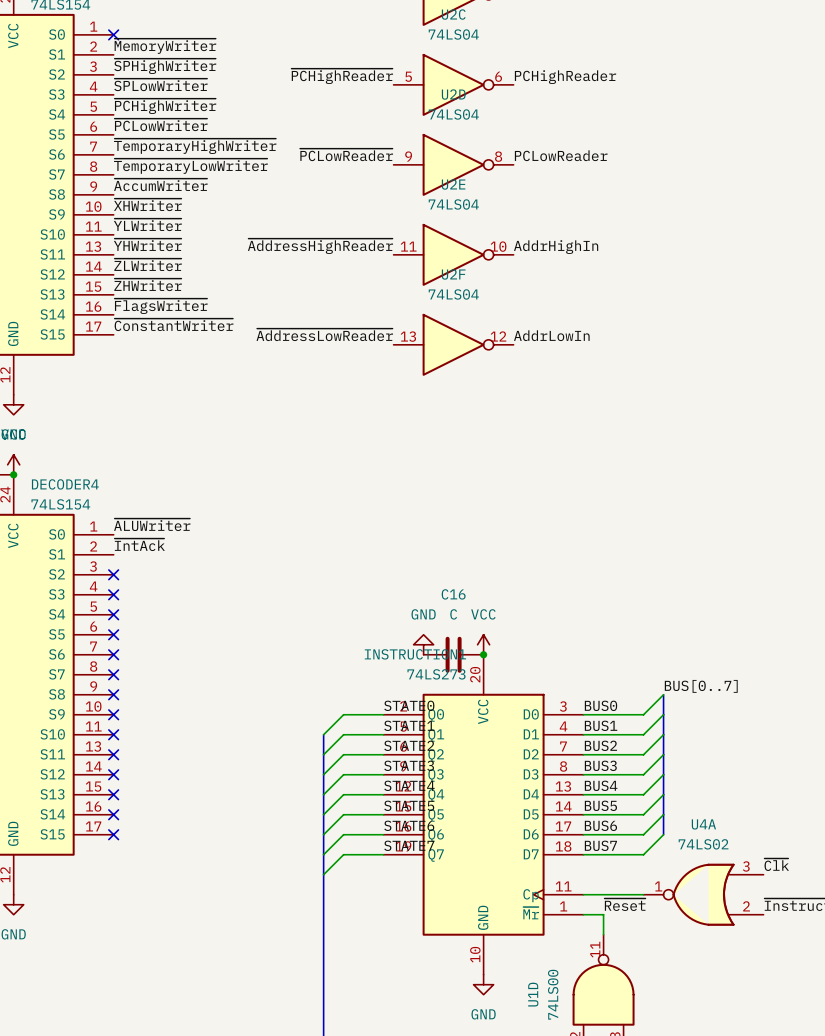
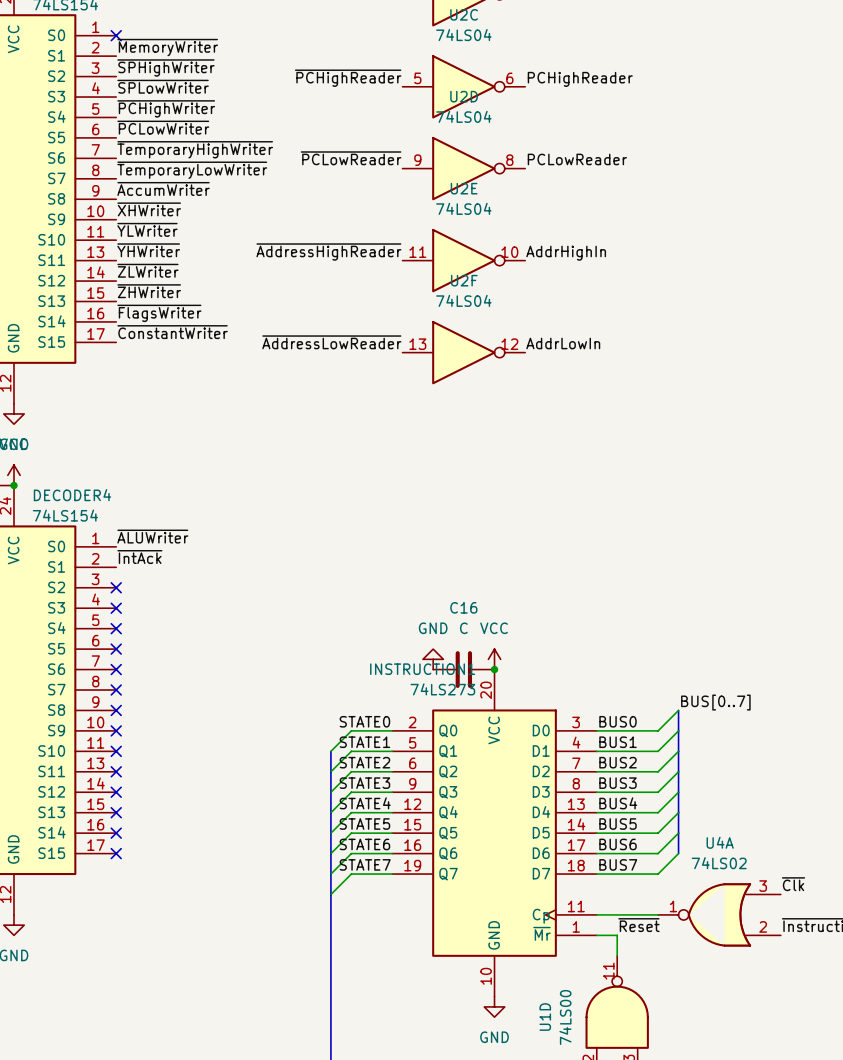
label position: STATE0 (409, 705) -> STATE0 (364, 721)
label position: STATE1 (409, 725) -> STATE1 (364, 742)
label position: STATE2 (409, 745) -> STATE2 (364, 762)
label position: STATE3 (409, 765) -> STATE3 (364, 783)
label position: STATE4 (409, 785) -> STATE4 (365, 803)
label position: STATE5 (409, 805) -> STATE5 (364, 824)
label position: STATE6 (409, 825) -> STATE6 (364, 844)
label position: STATE7 (409, 845) -> STATE7 (365, 864)

